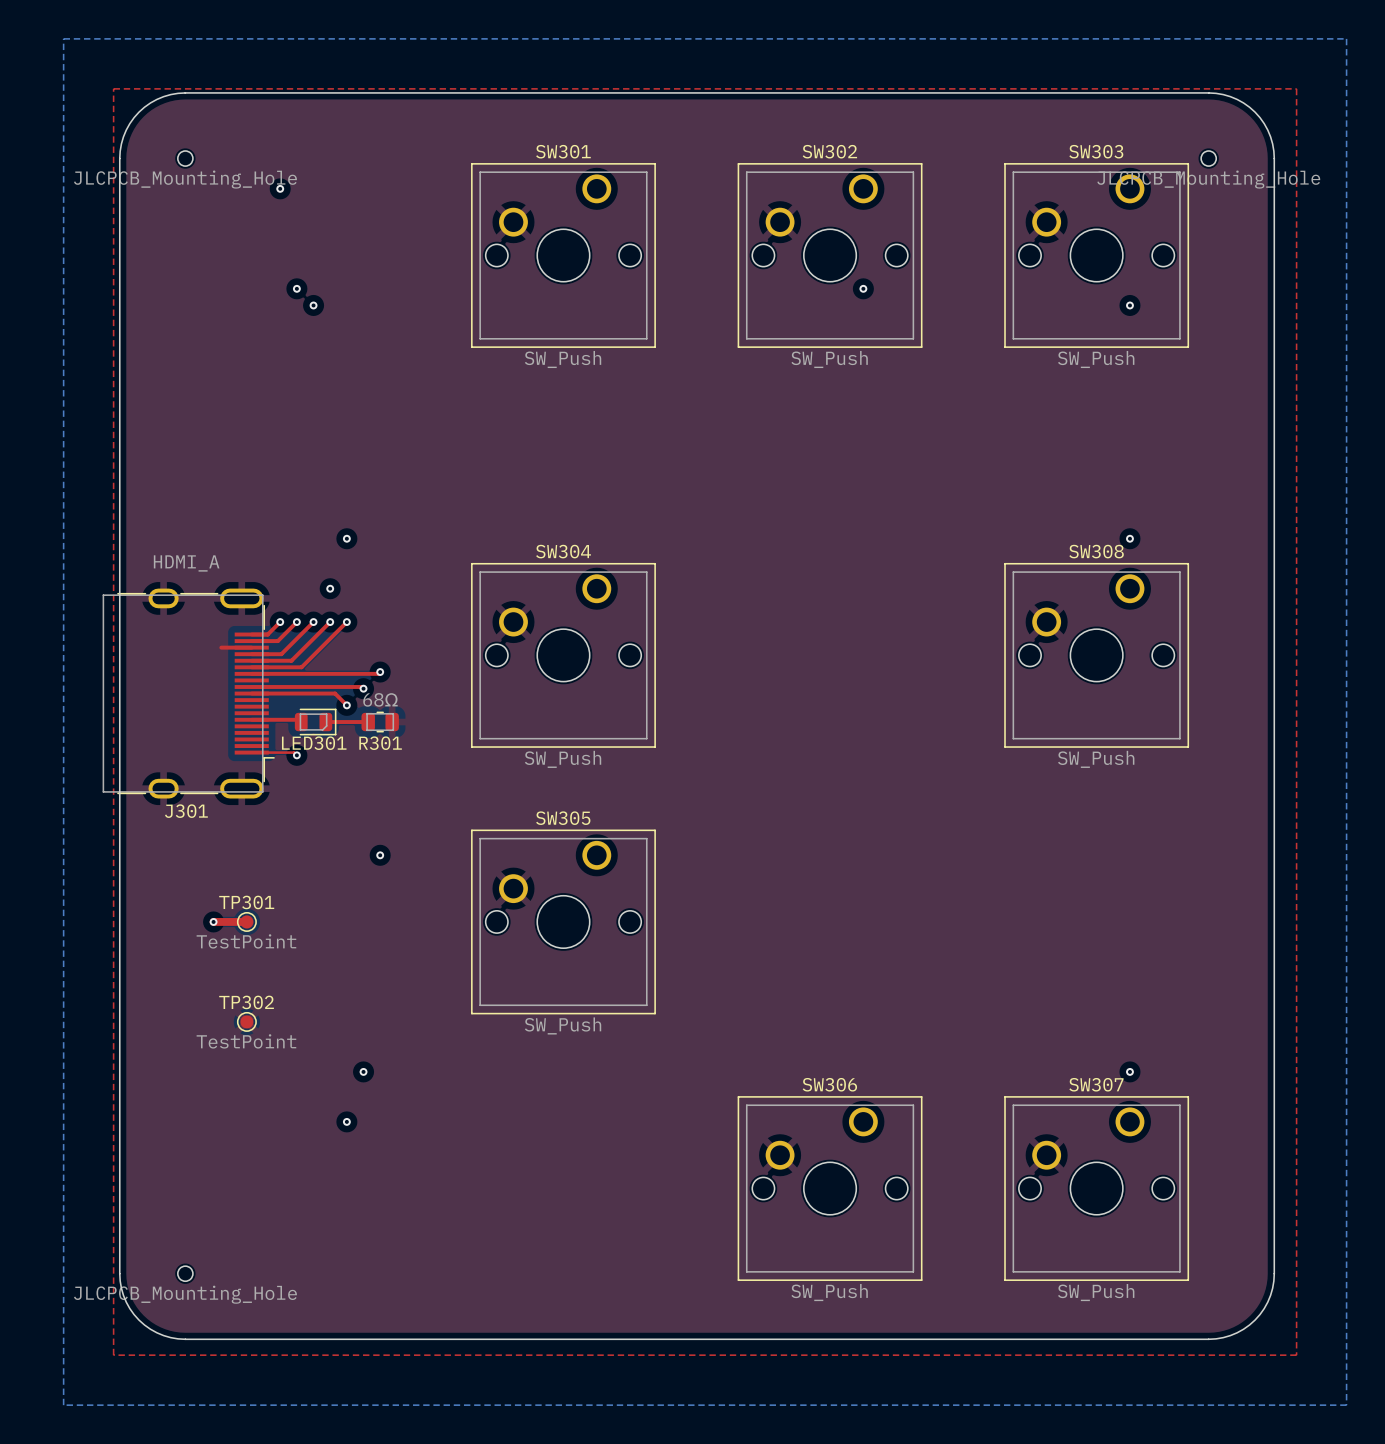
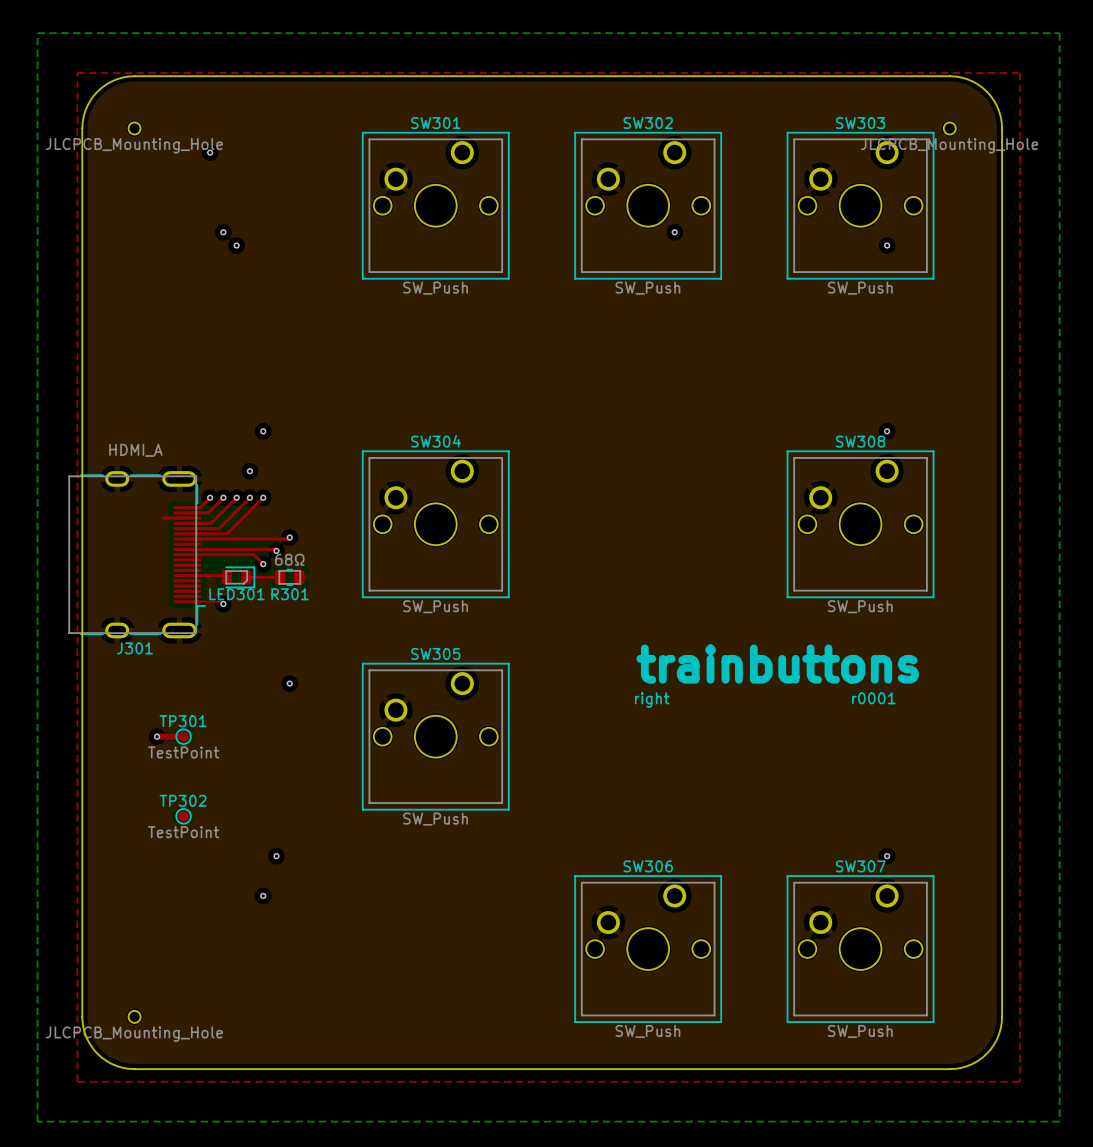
text: none -> trainbuttons (777, 664)
text: none -> r0001 (873, 698)
text: none -> right (652, 700)

